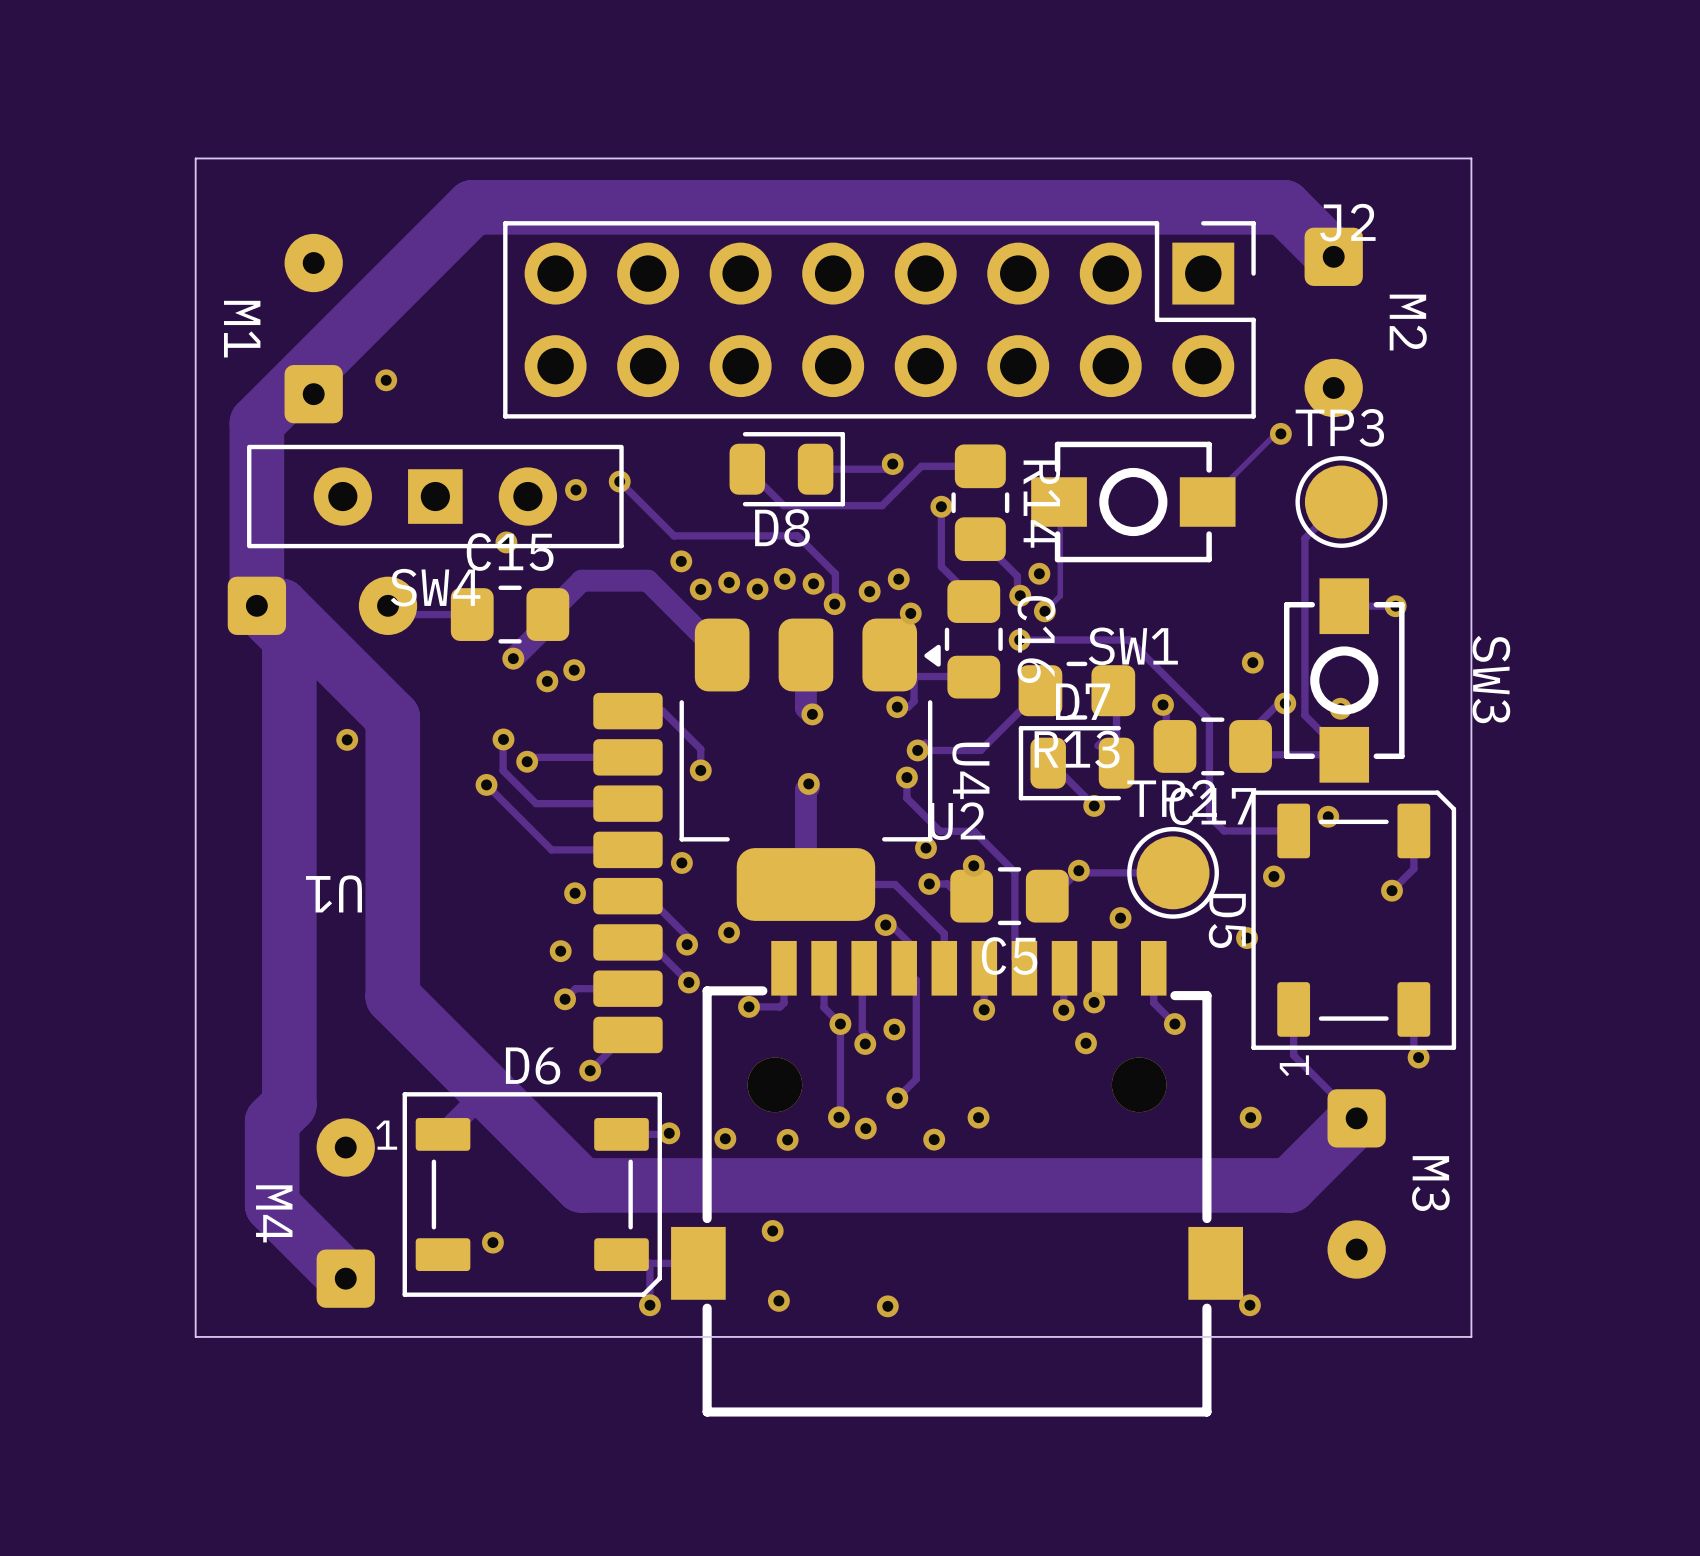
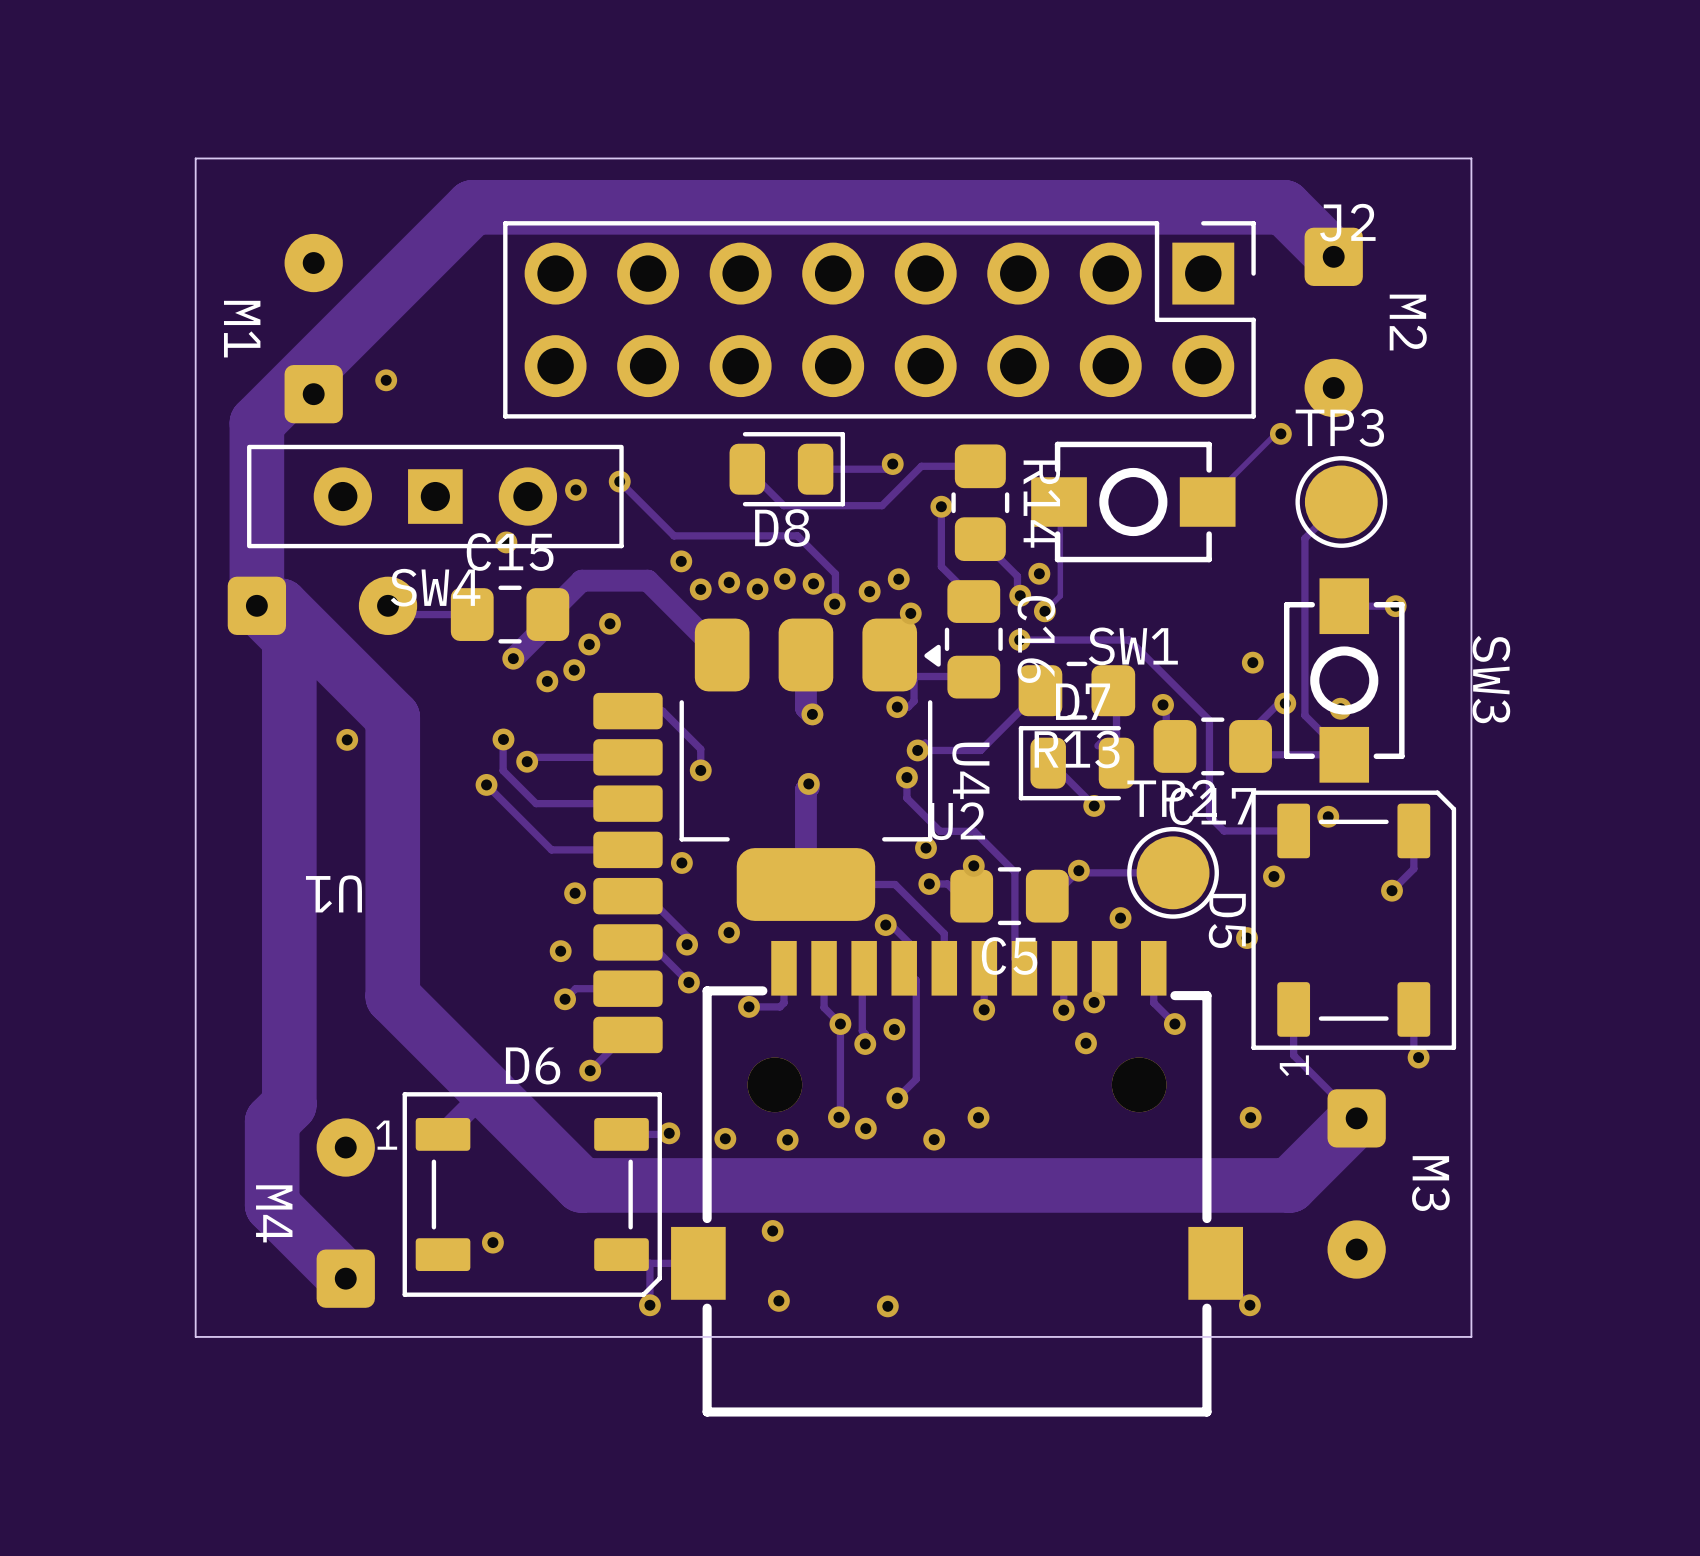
via: none -> (610, 623)
via: none -> (589, 644)

